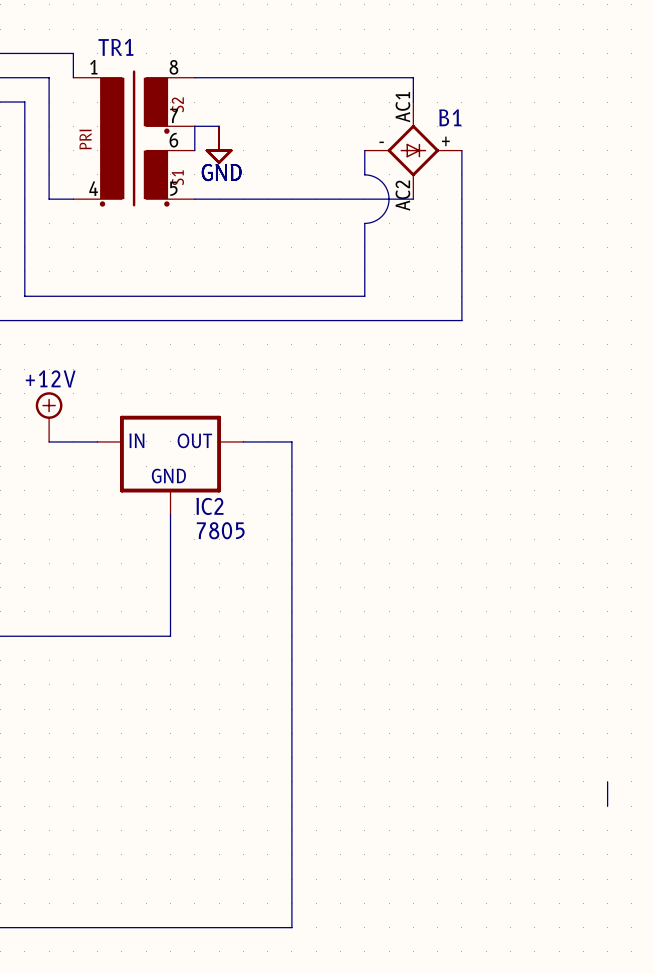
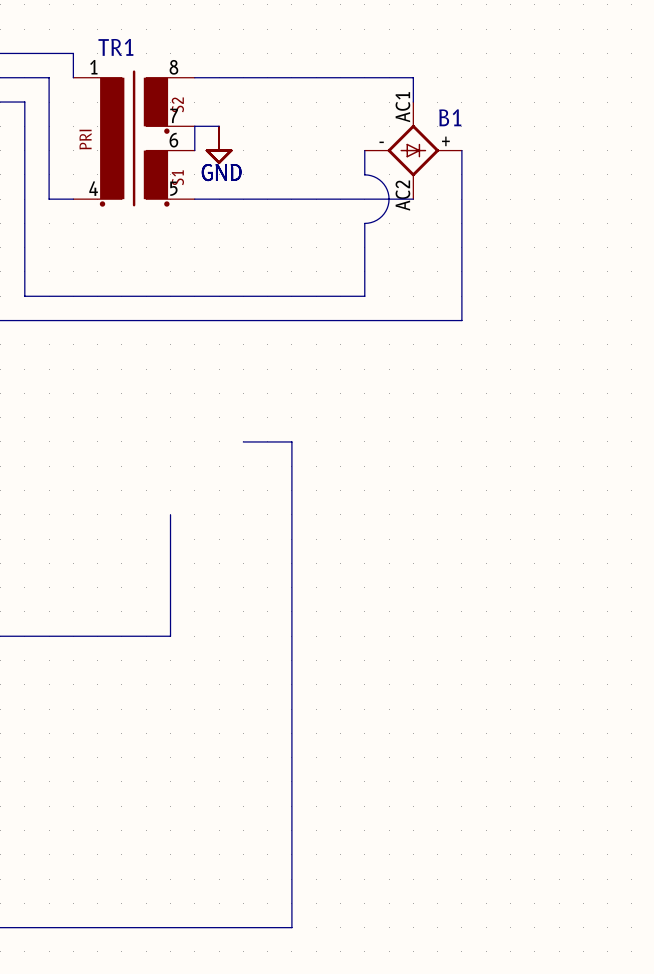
power symbol: +12V (49, 417) -> none
wire: (49, 441) (97, 441) -> none
IC2: 7805 (170, 465) -> none
wire: (607, 781) (607, 806) -> none

